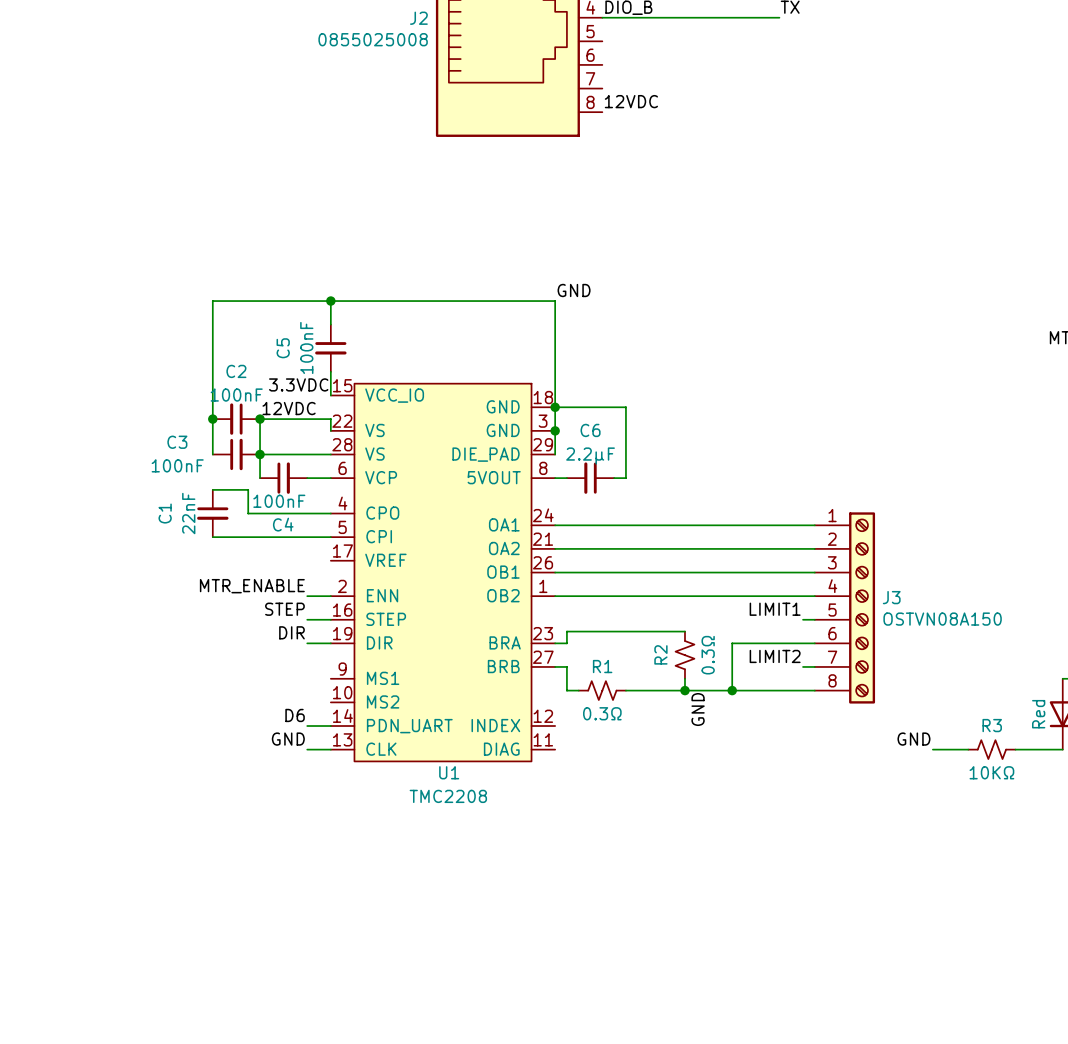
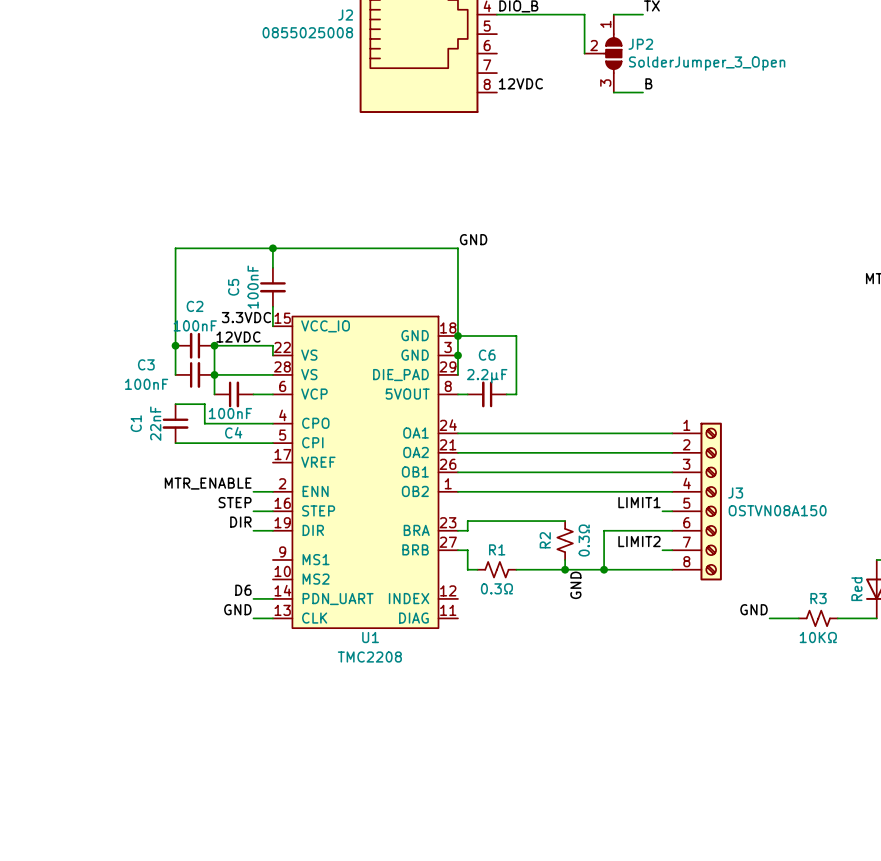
wire: (708, 17) (744, 17) -> (584, 14) (584, 53)
JP2: none -> SolderJumper_3_Open (603, 53)
label: none -> B (648, 83)
wire: none -> (613, 92) (643, 92)

